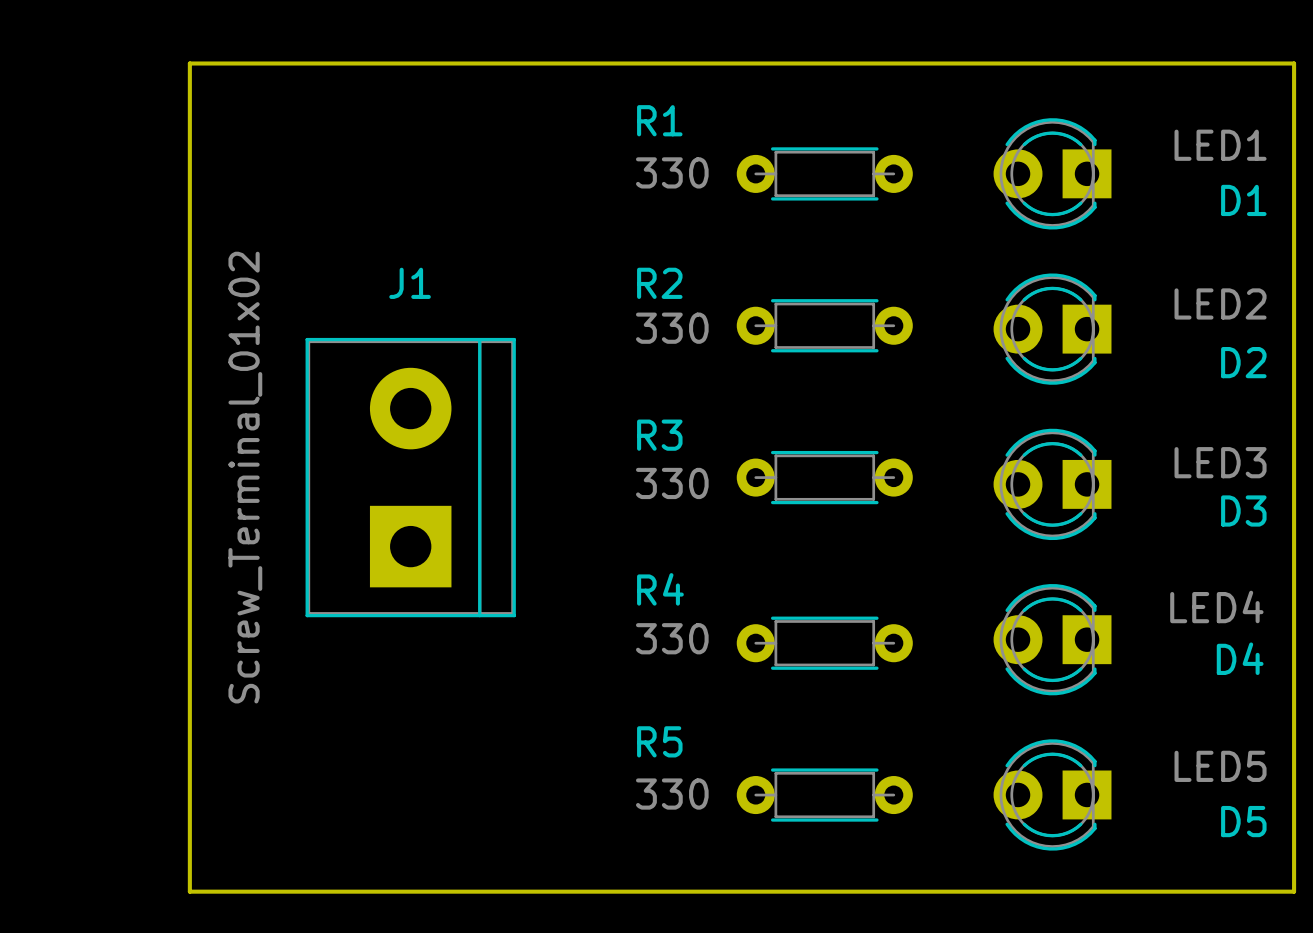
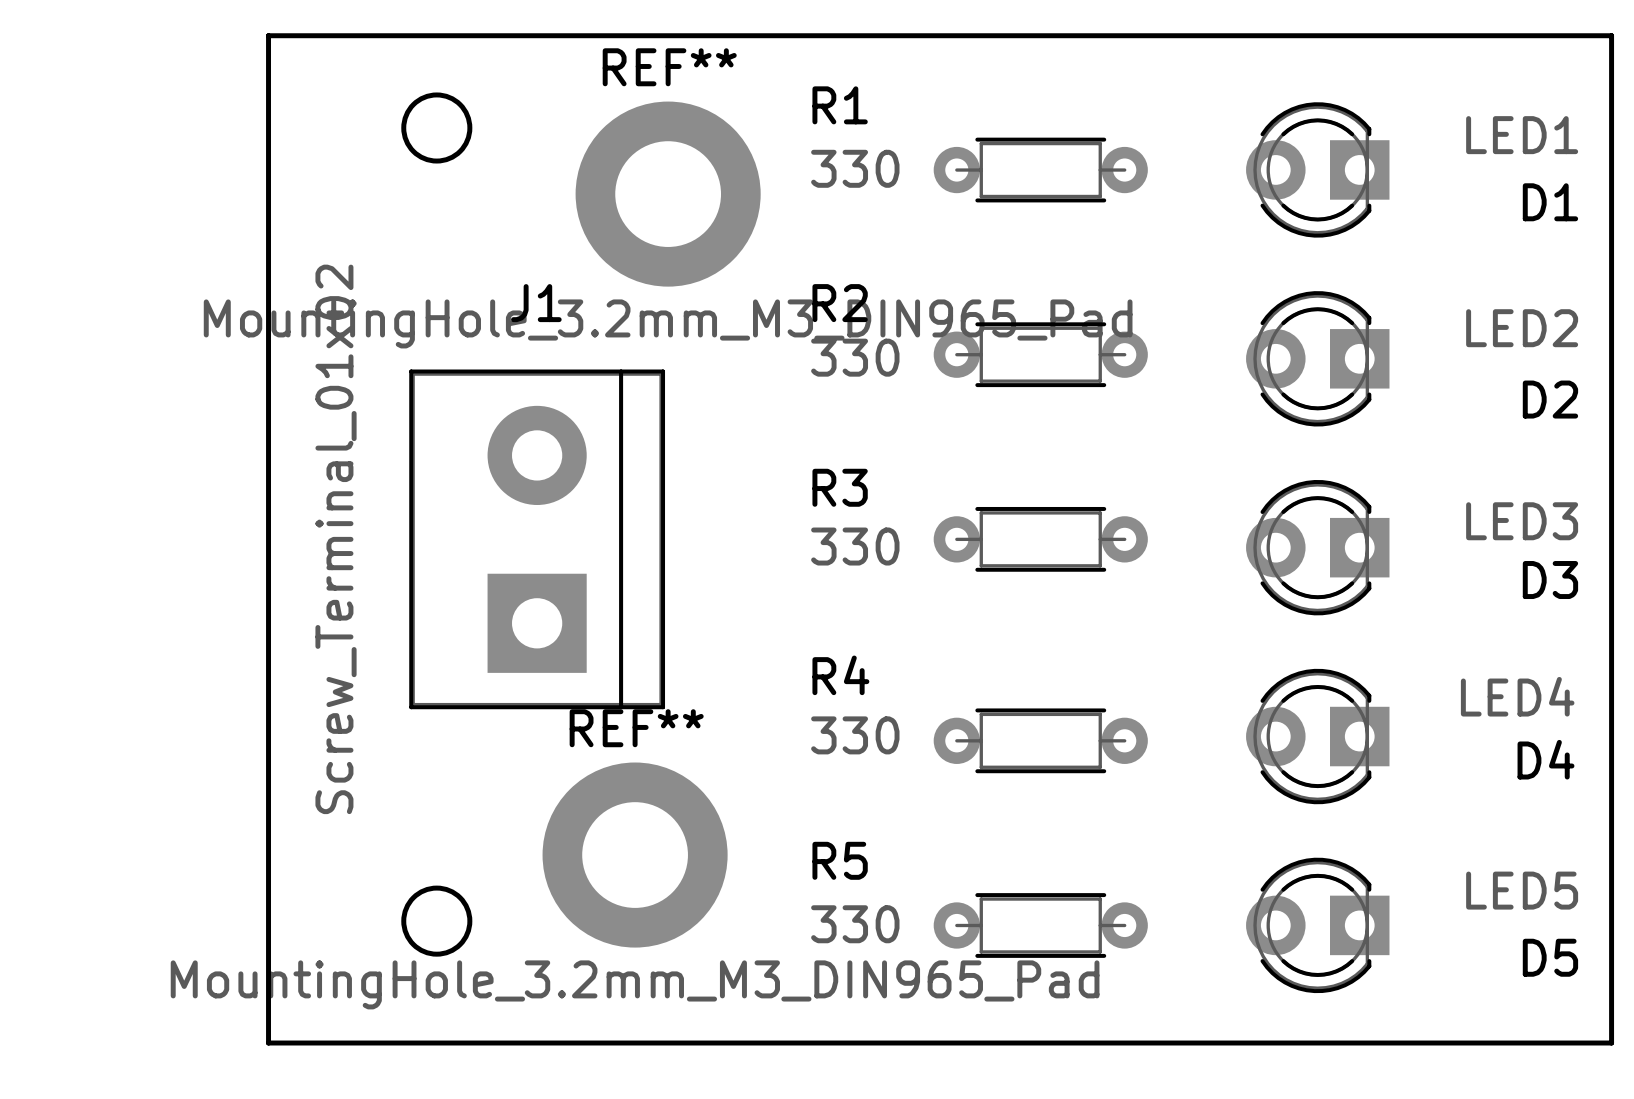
round board edge: none -> [401, 92, 473, 164]
REF**: none -> MountingHole_3.2mm_M3_DIN965_Pad (668, 194)
REF**: none -> MountingHole_3.2mm_M3_DIN965_Pad (635, 855)
round board edge: none -> [401, 885, 473, 957]

